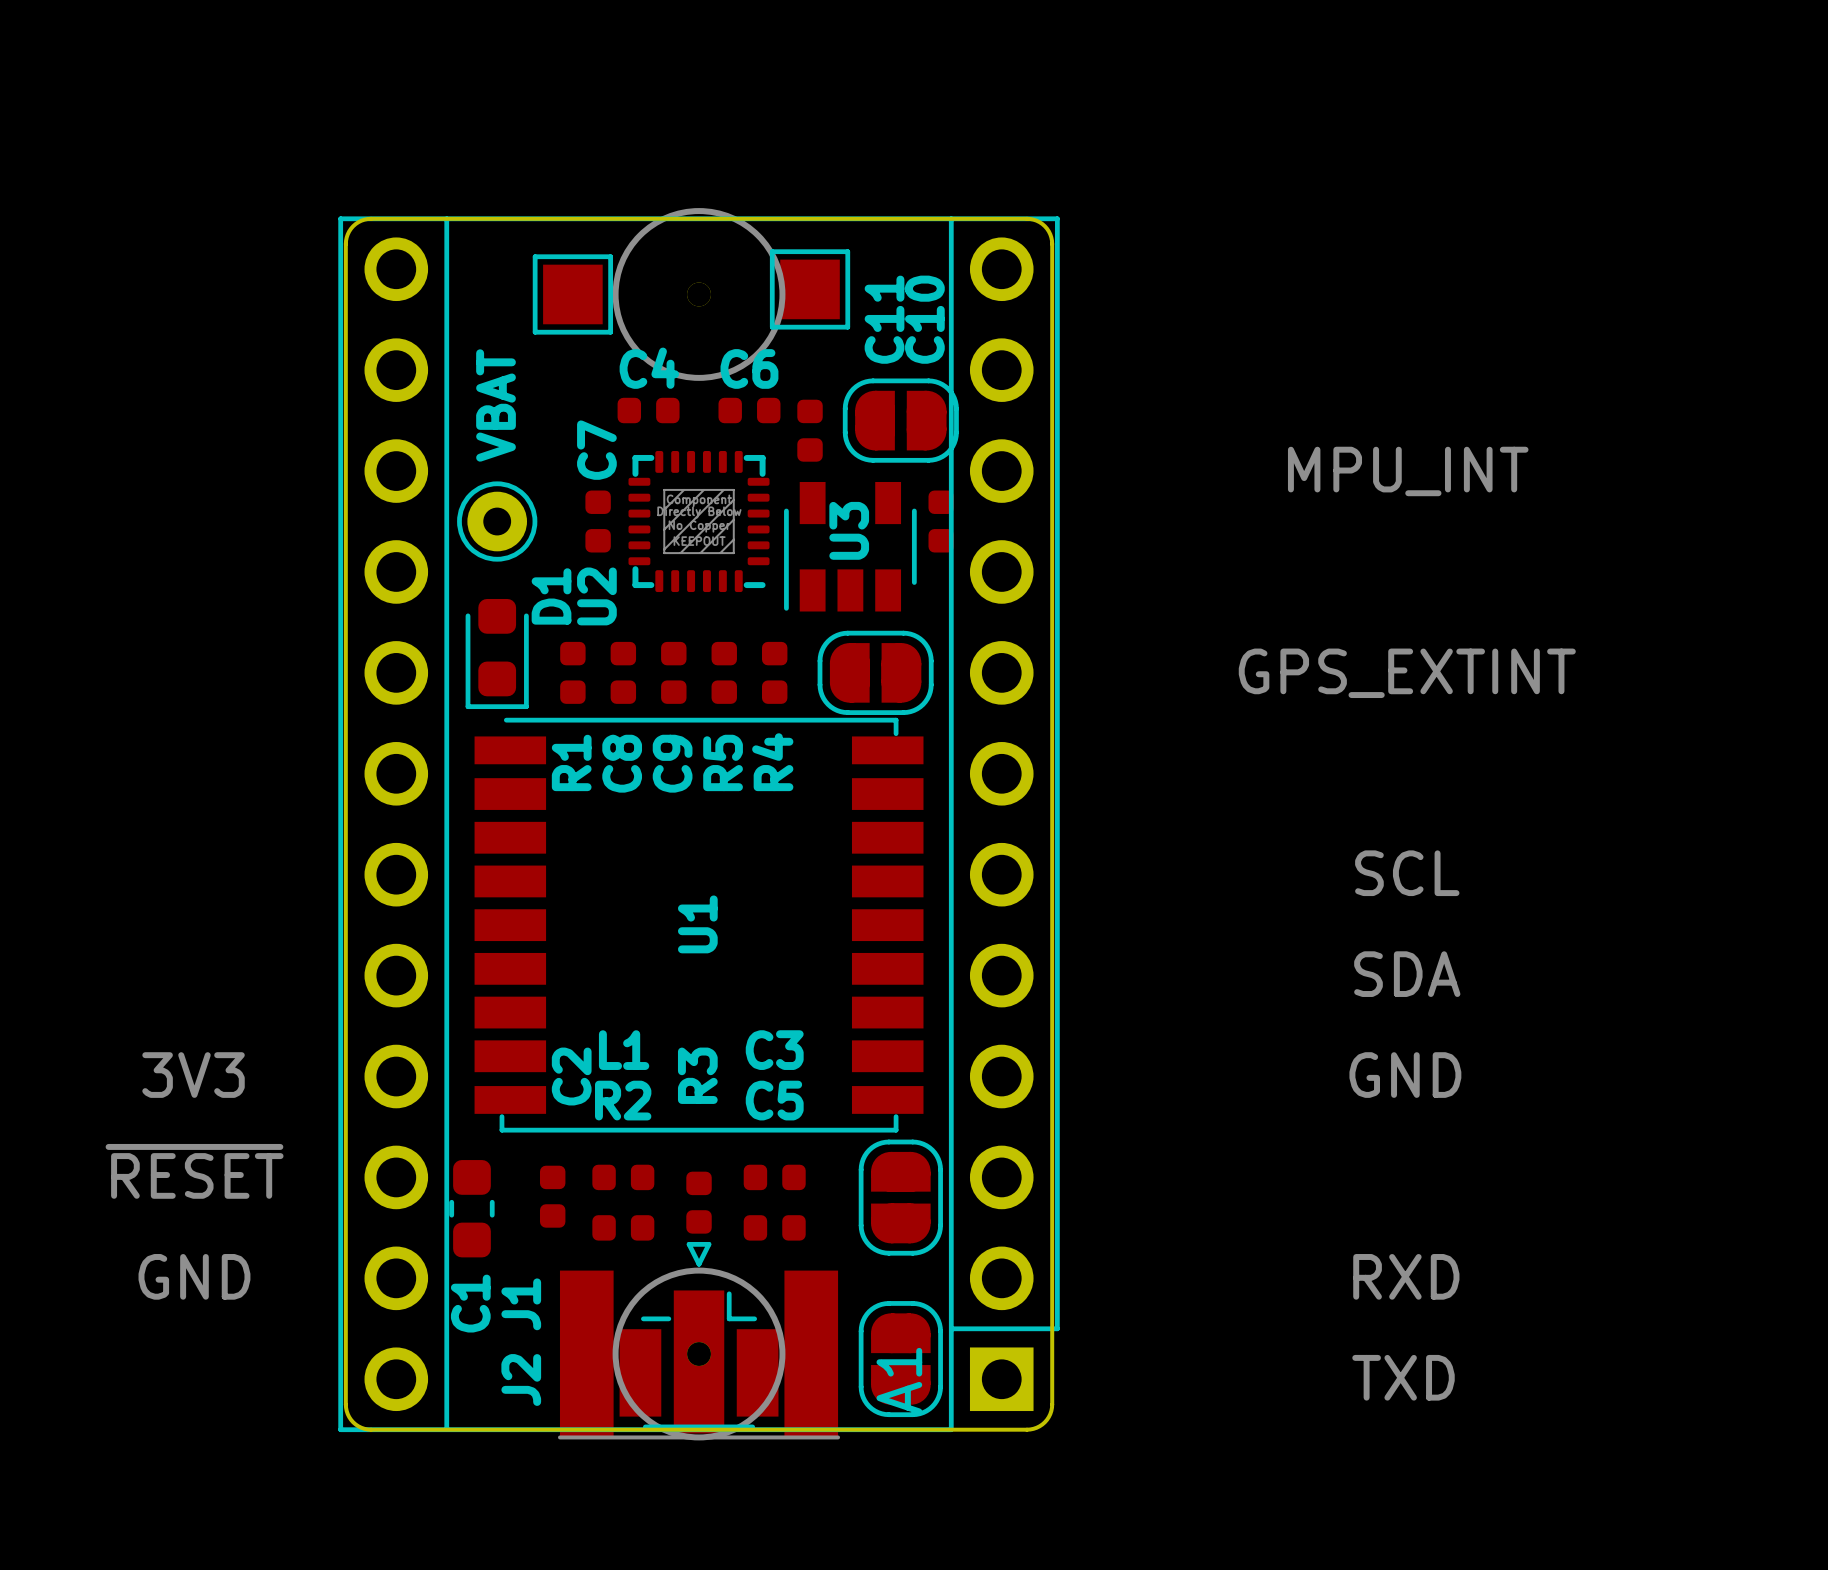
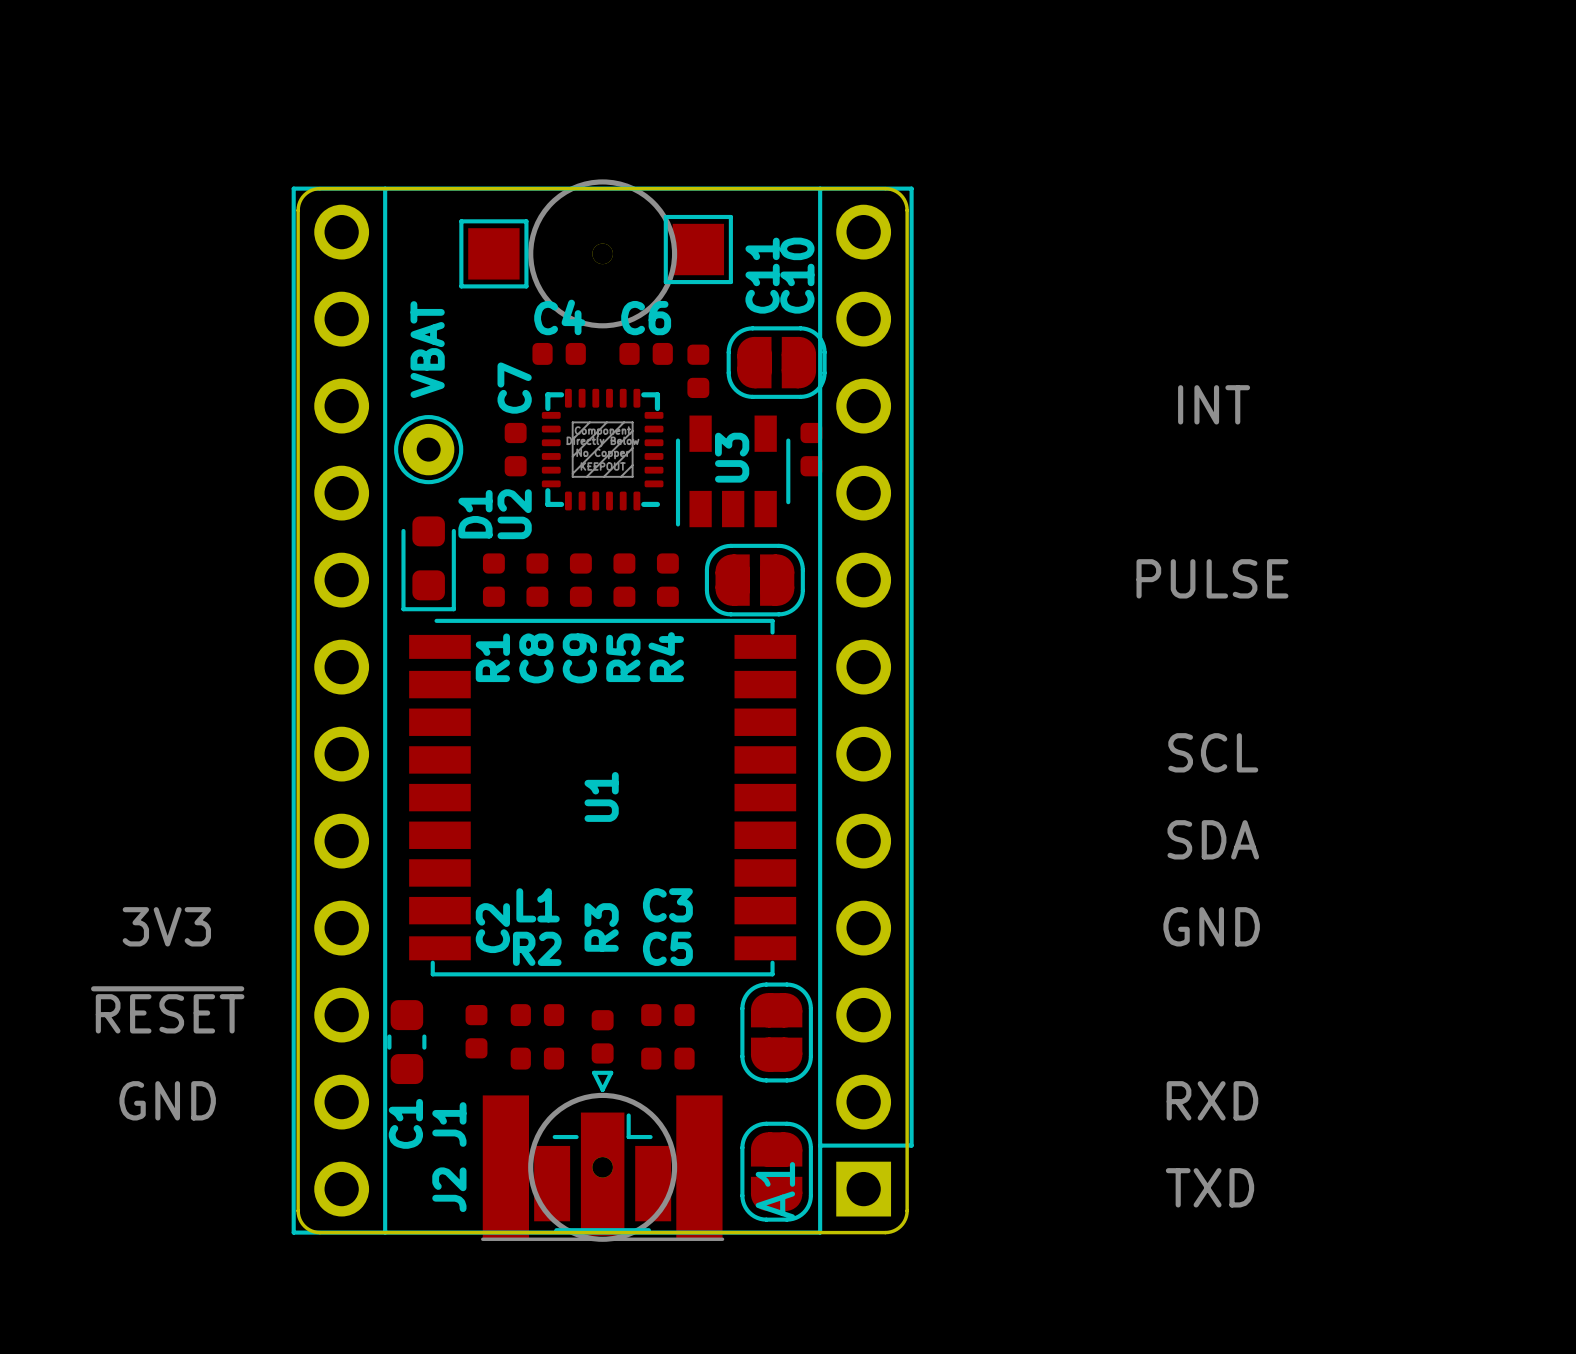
text: MPU_INT (1408, 471) -> INT (1214, 404)
text: GPS_EXTINT (1407, 673) -> PULSE (1212, 578)

